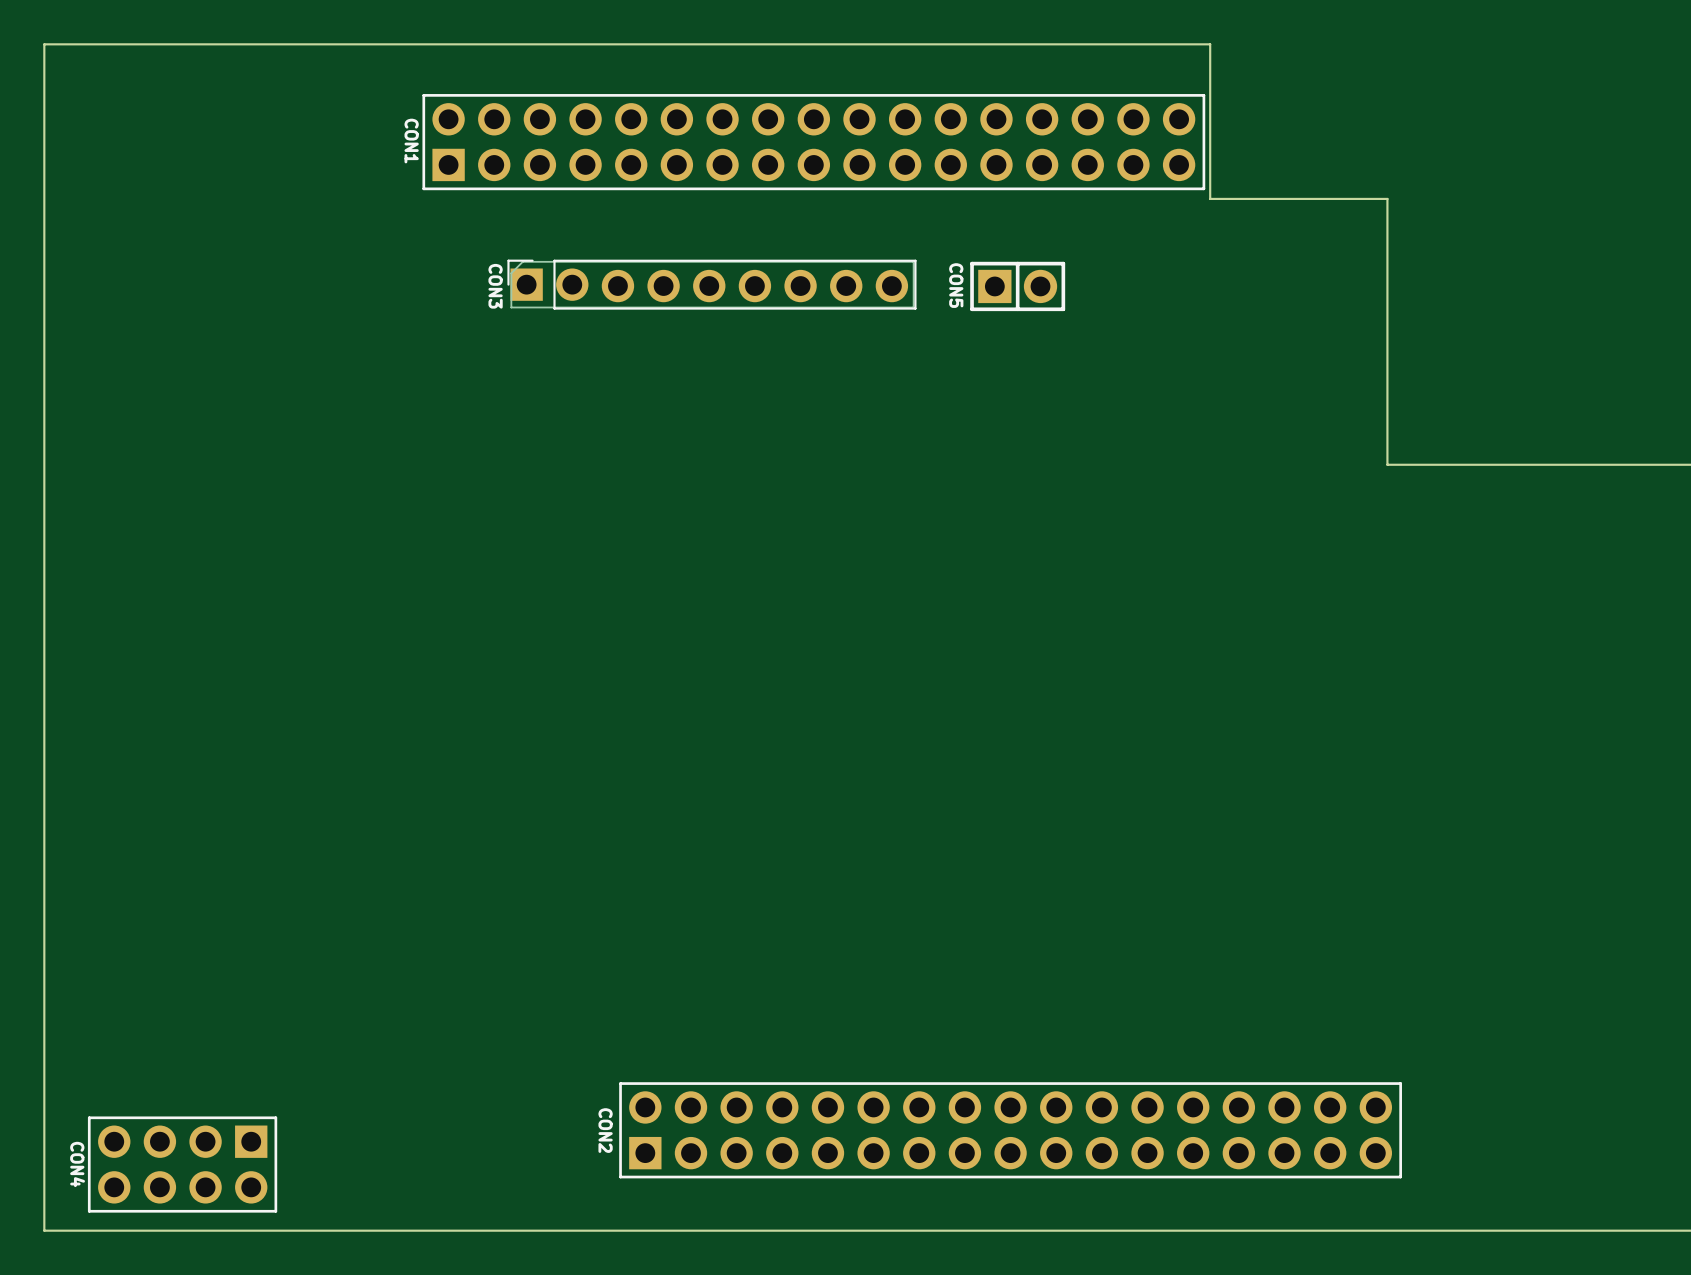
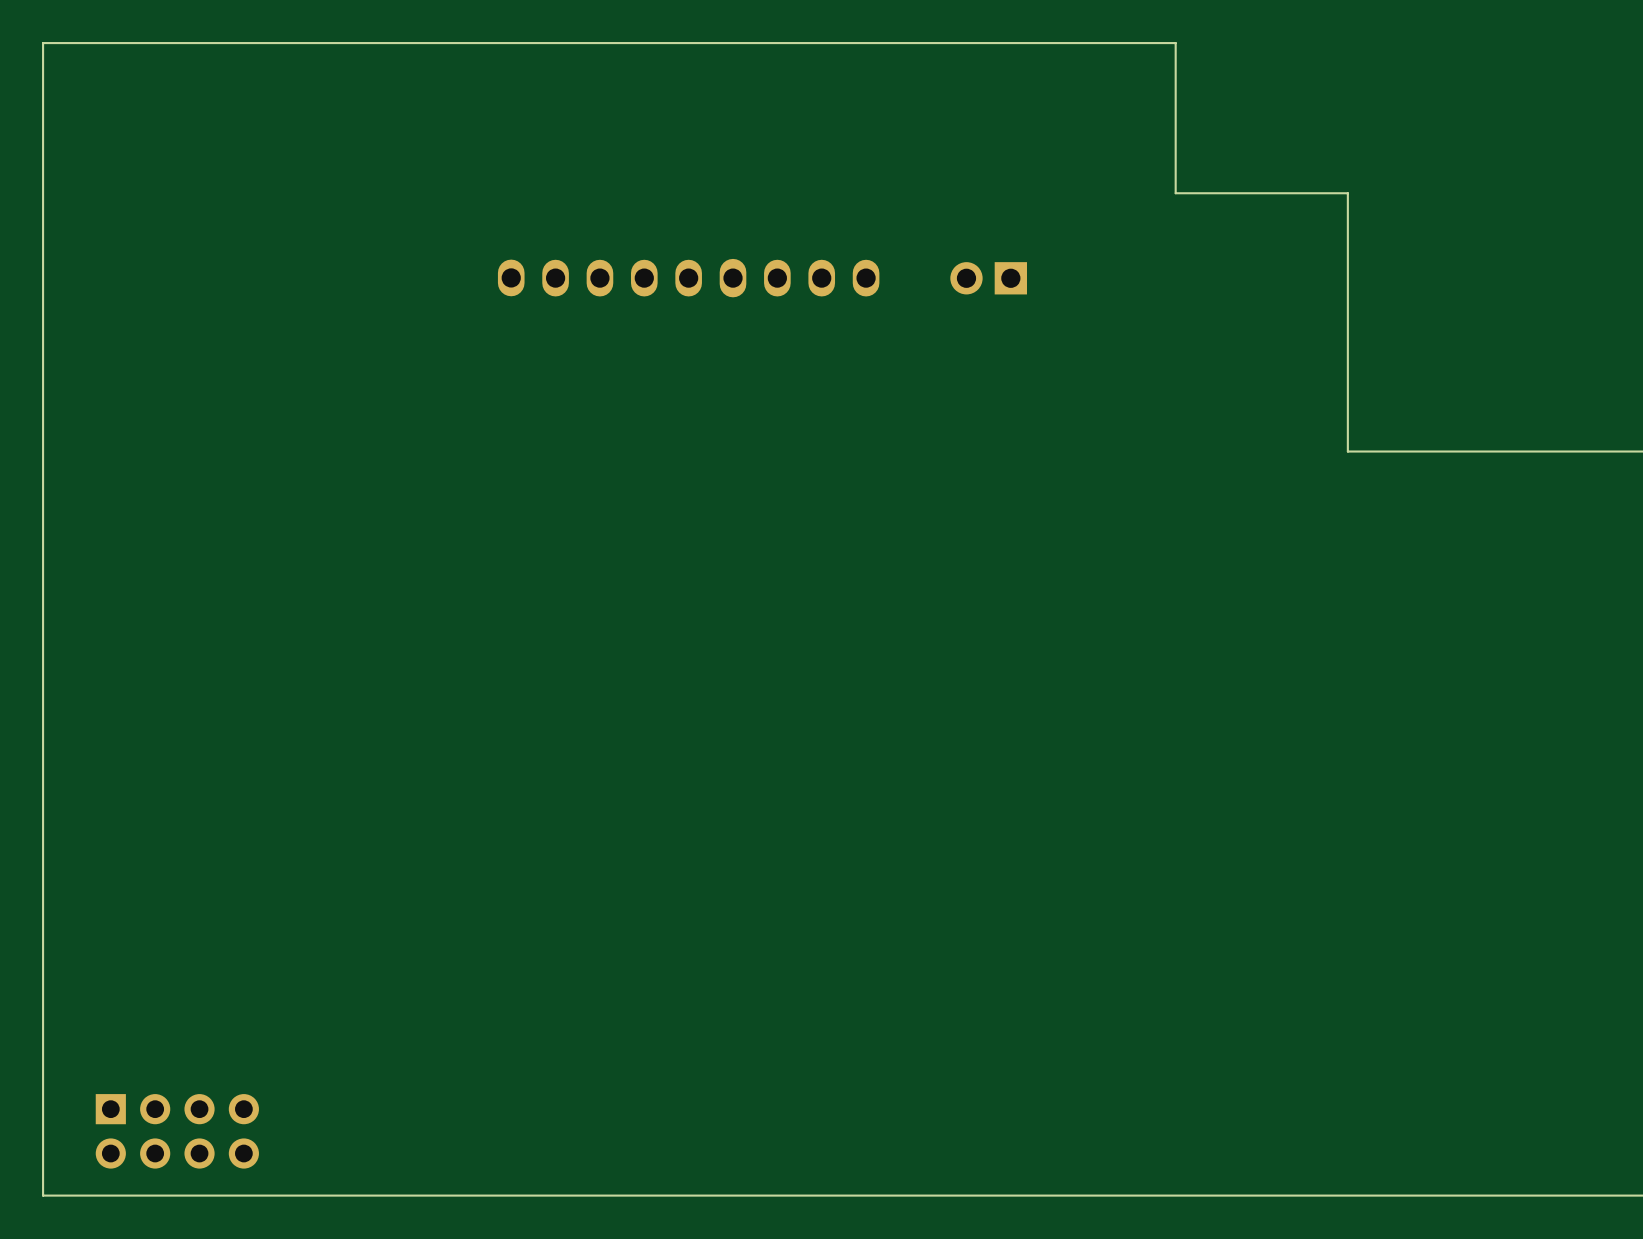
CON1: (813, 142) -> none
CON3: (711, 284) -> none
part: none -> (688, 278)
CON5: (1017, 286) -> none
part: none -> (988, 278)
CON2: (1010, 1130) -> none
CON4: (182, 1164) -> none
part: none -> (177, 1131)

